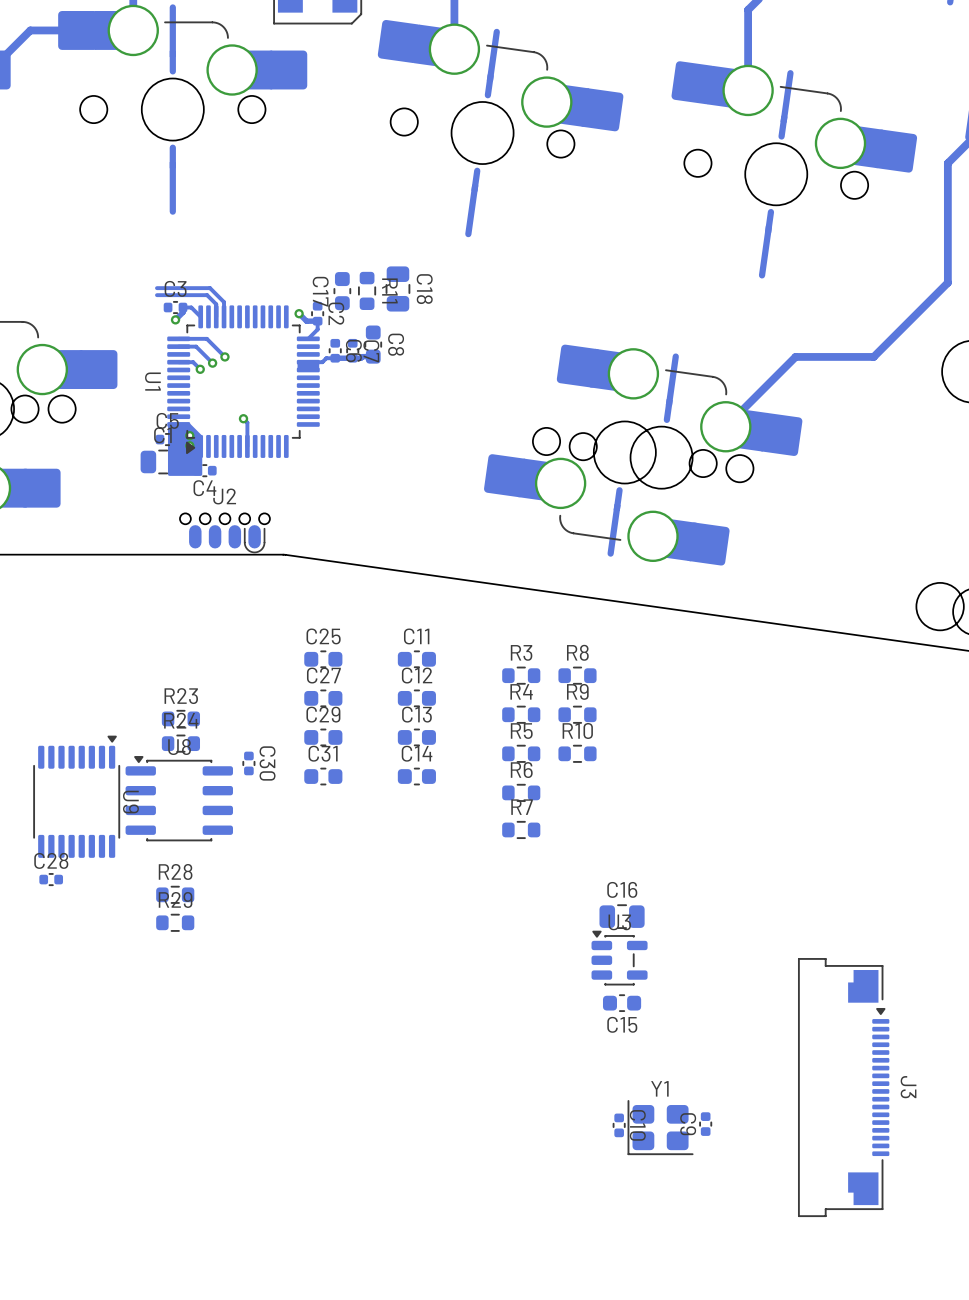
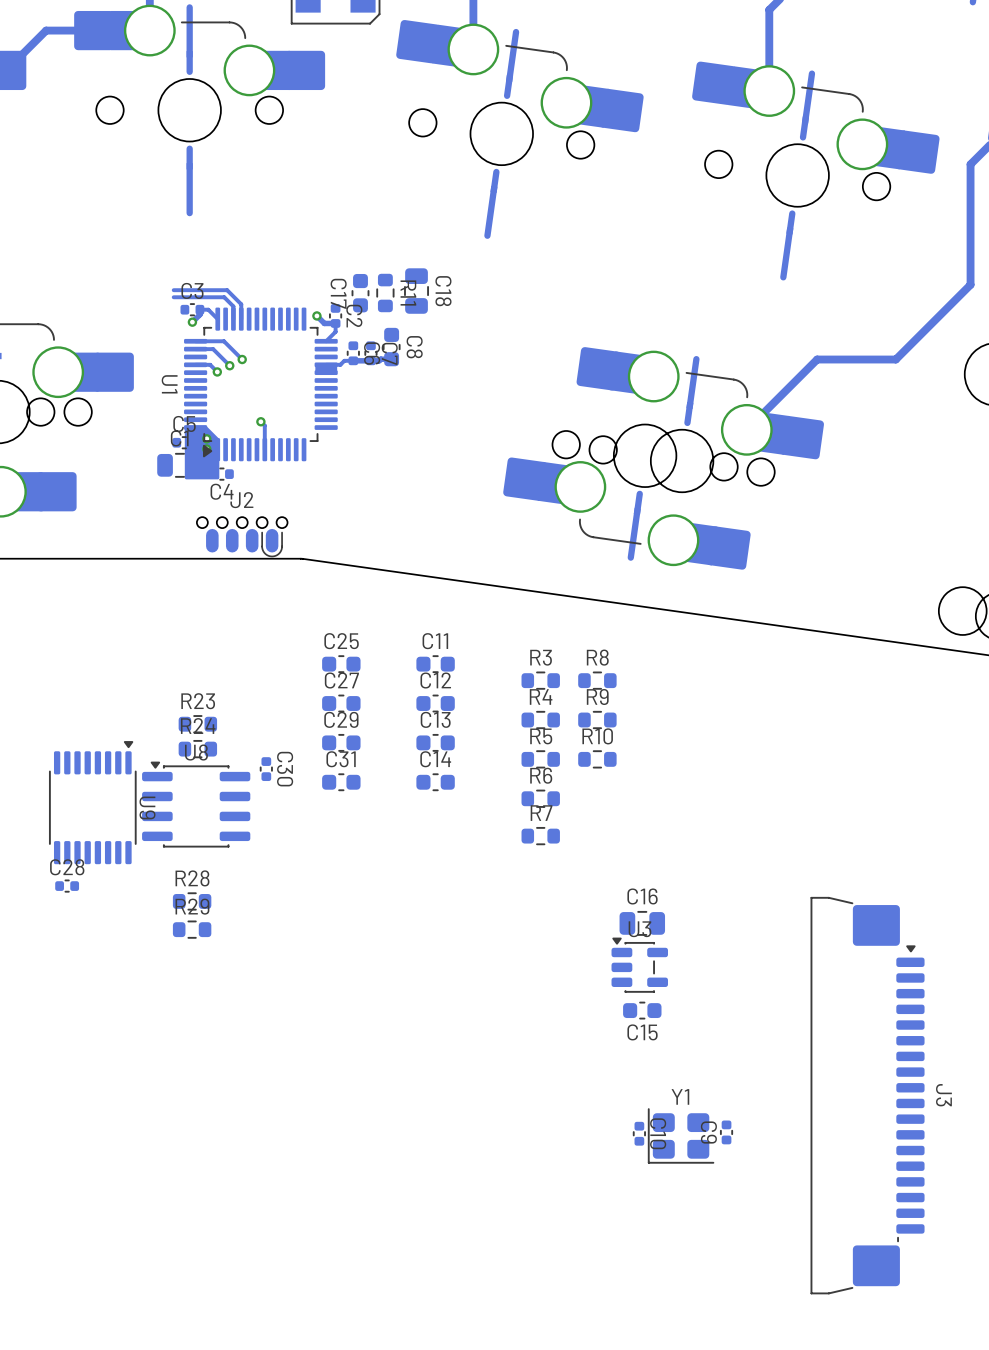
J3 footprint: [797, 958, 890, 1218] -> [810, 896, 925, 1295]

